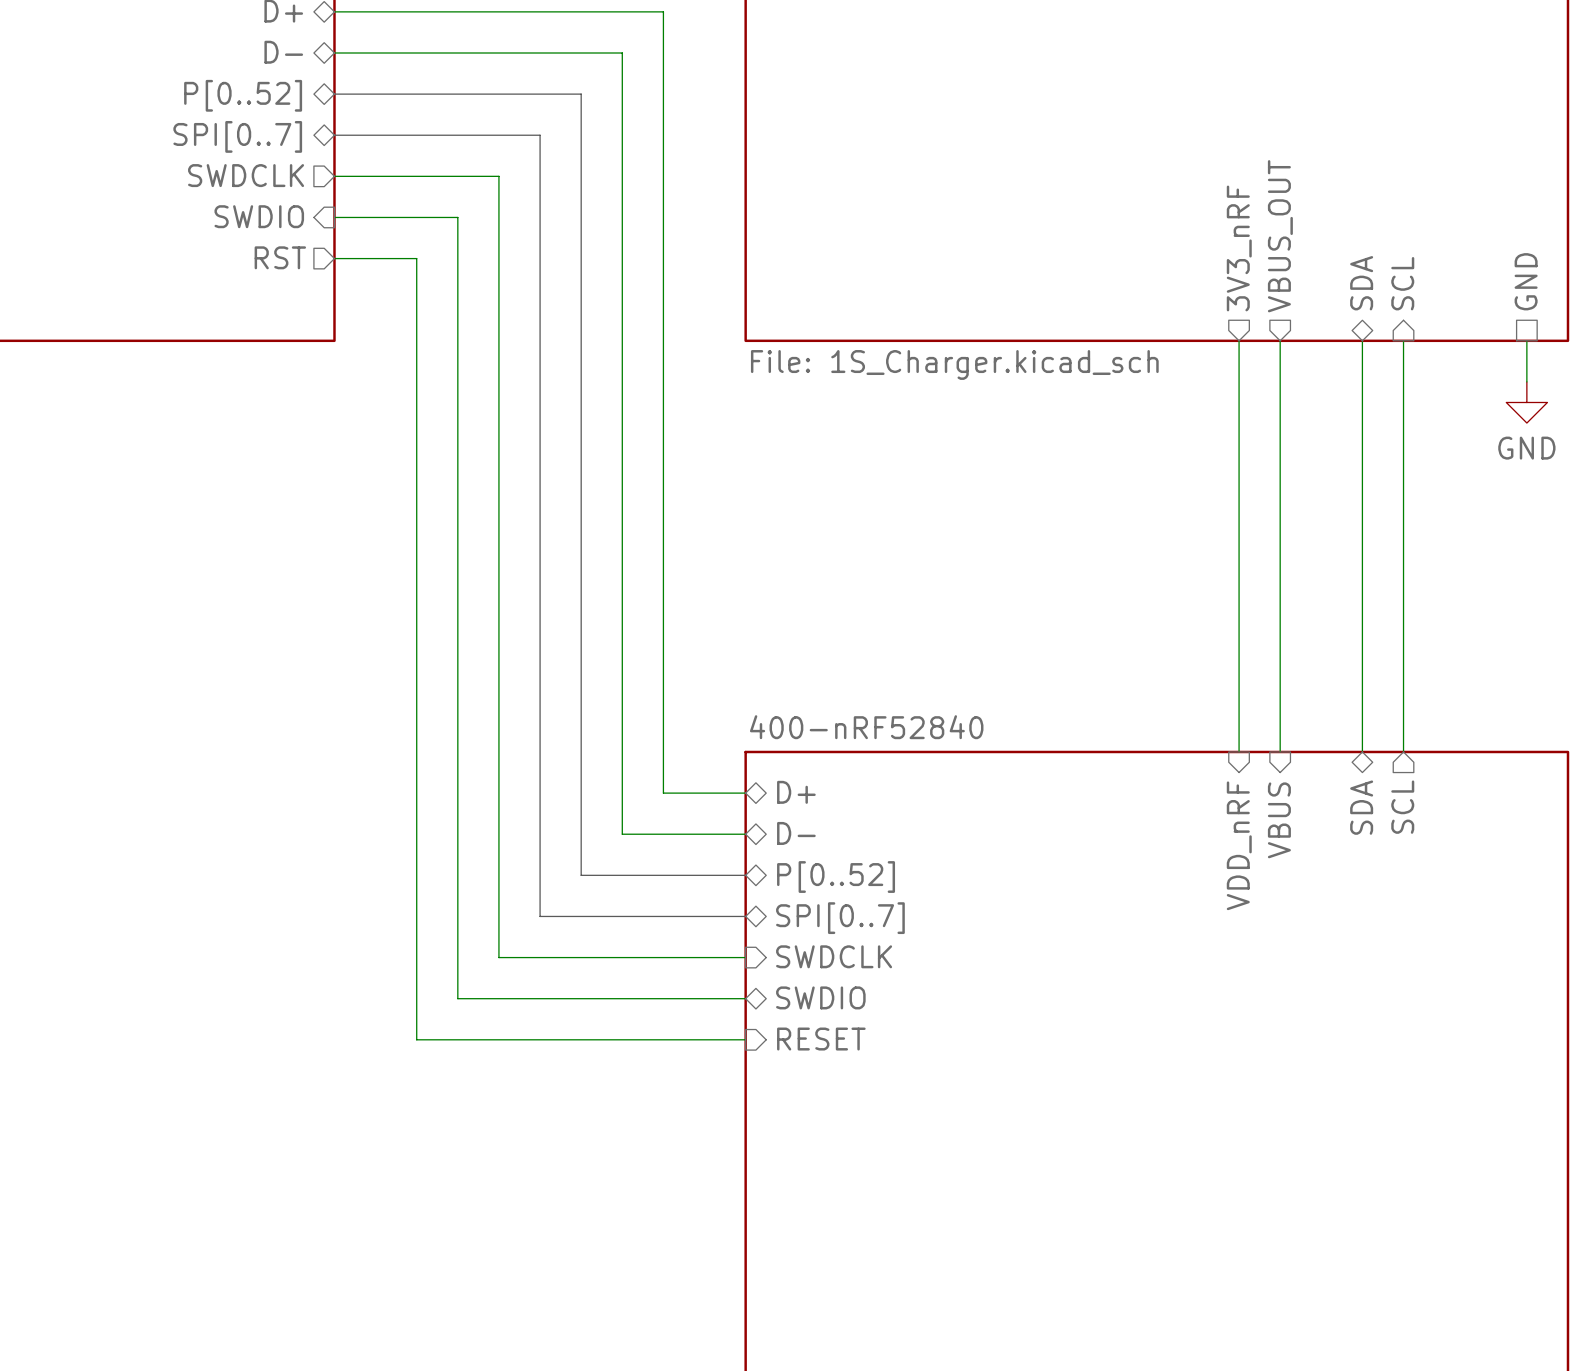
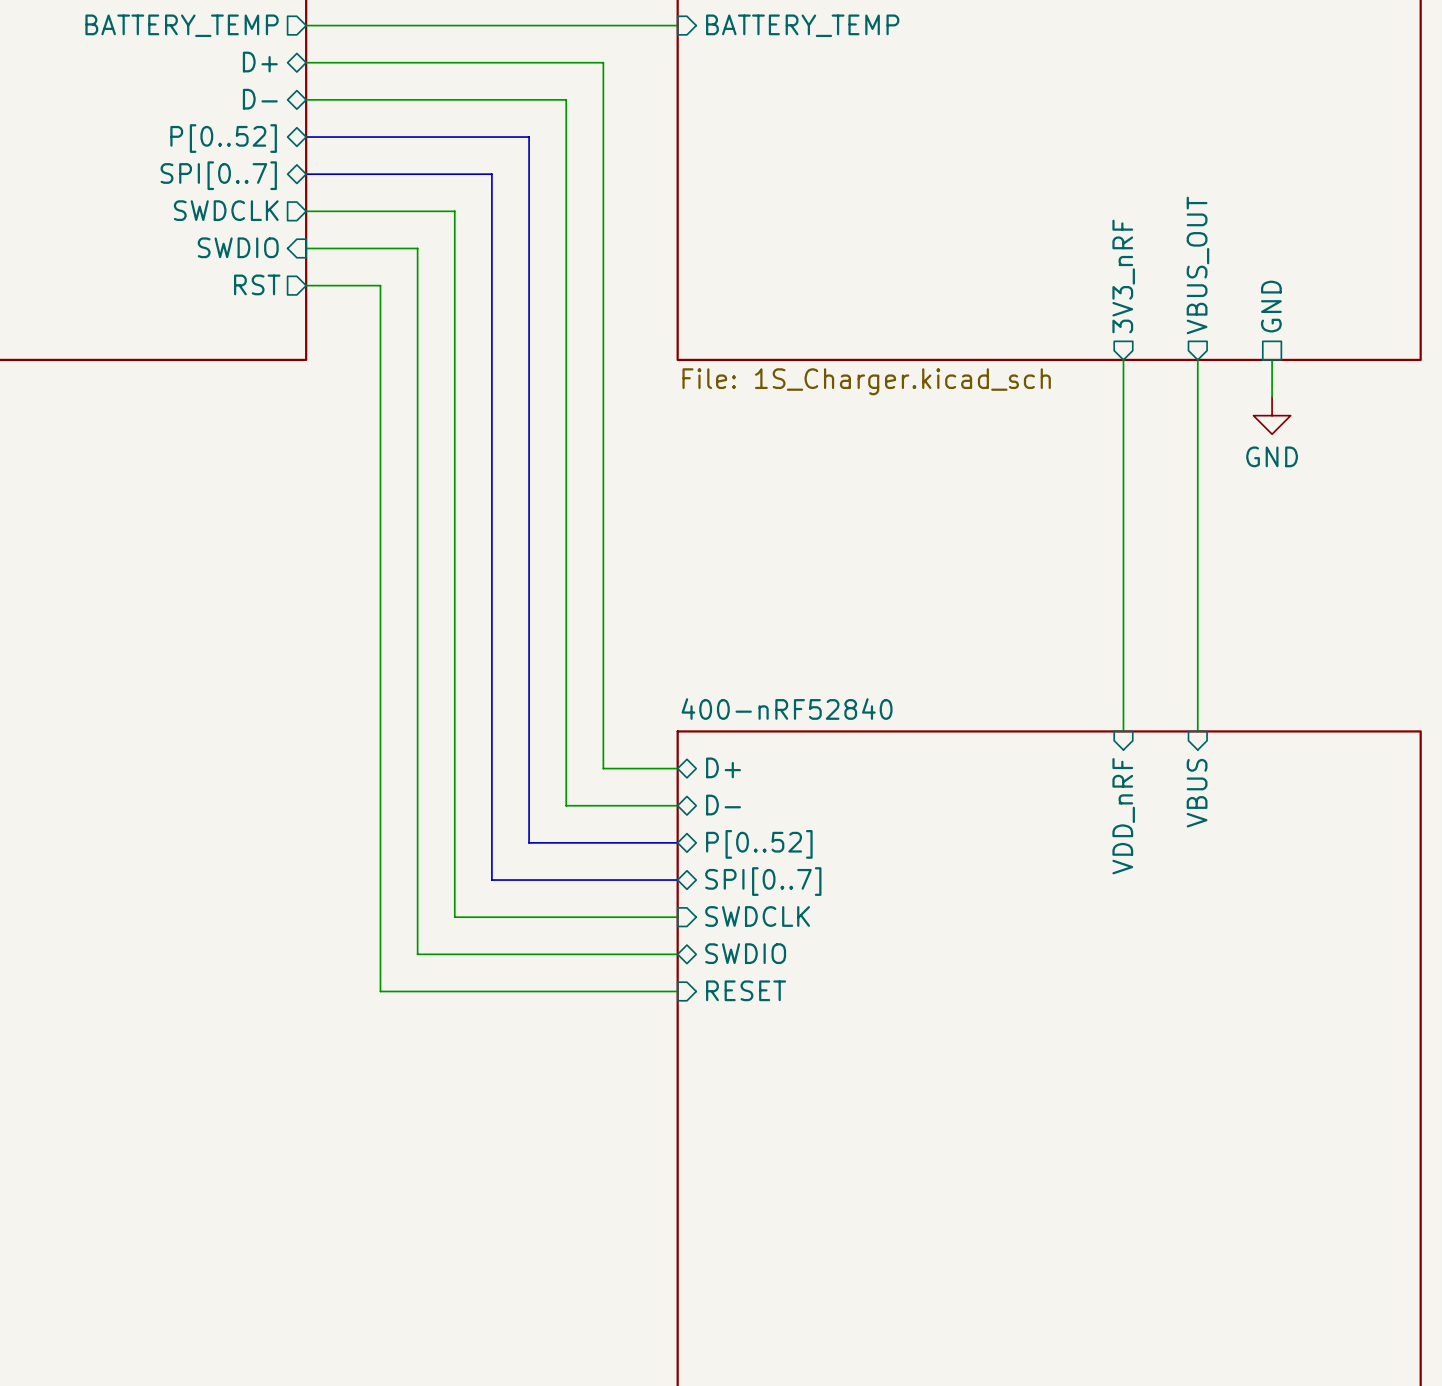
sheet pin position: VBUS_OUT (1280, 236) -> VBUS_OUT (1197, 265)
sheet pin: GND (1526, 281) -> none
sheet pin: SDA (1361, 283) -> none
sheet pin shape: input (1402, 283) -> passive (1271, 306)
sheet pin: SCL (1402, 283) -> GND (1271, 306)
wire: (1280, 340) (1280, 751) -> (1197, 359) (1197, 731)
wire: (1362, 340) (1362, 751) -> none
wire: (1526, 340) (1526, 381) -> none
wire: (1403, 381) (1403, 751) -> none
power symbol position: GND (1526, 402) -> GND (1272, 415)
sheet pin: SDA (1361, 807) -> none
sheet pin: SCL (1402, 807) -> none
sheet pin position: VBUS (1279, 820) -> VBUS (1197, 793)

